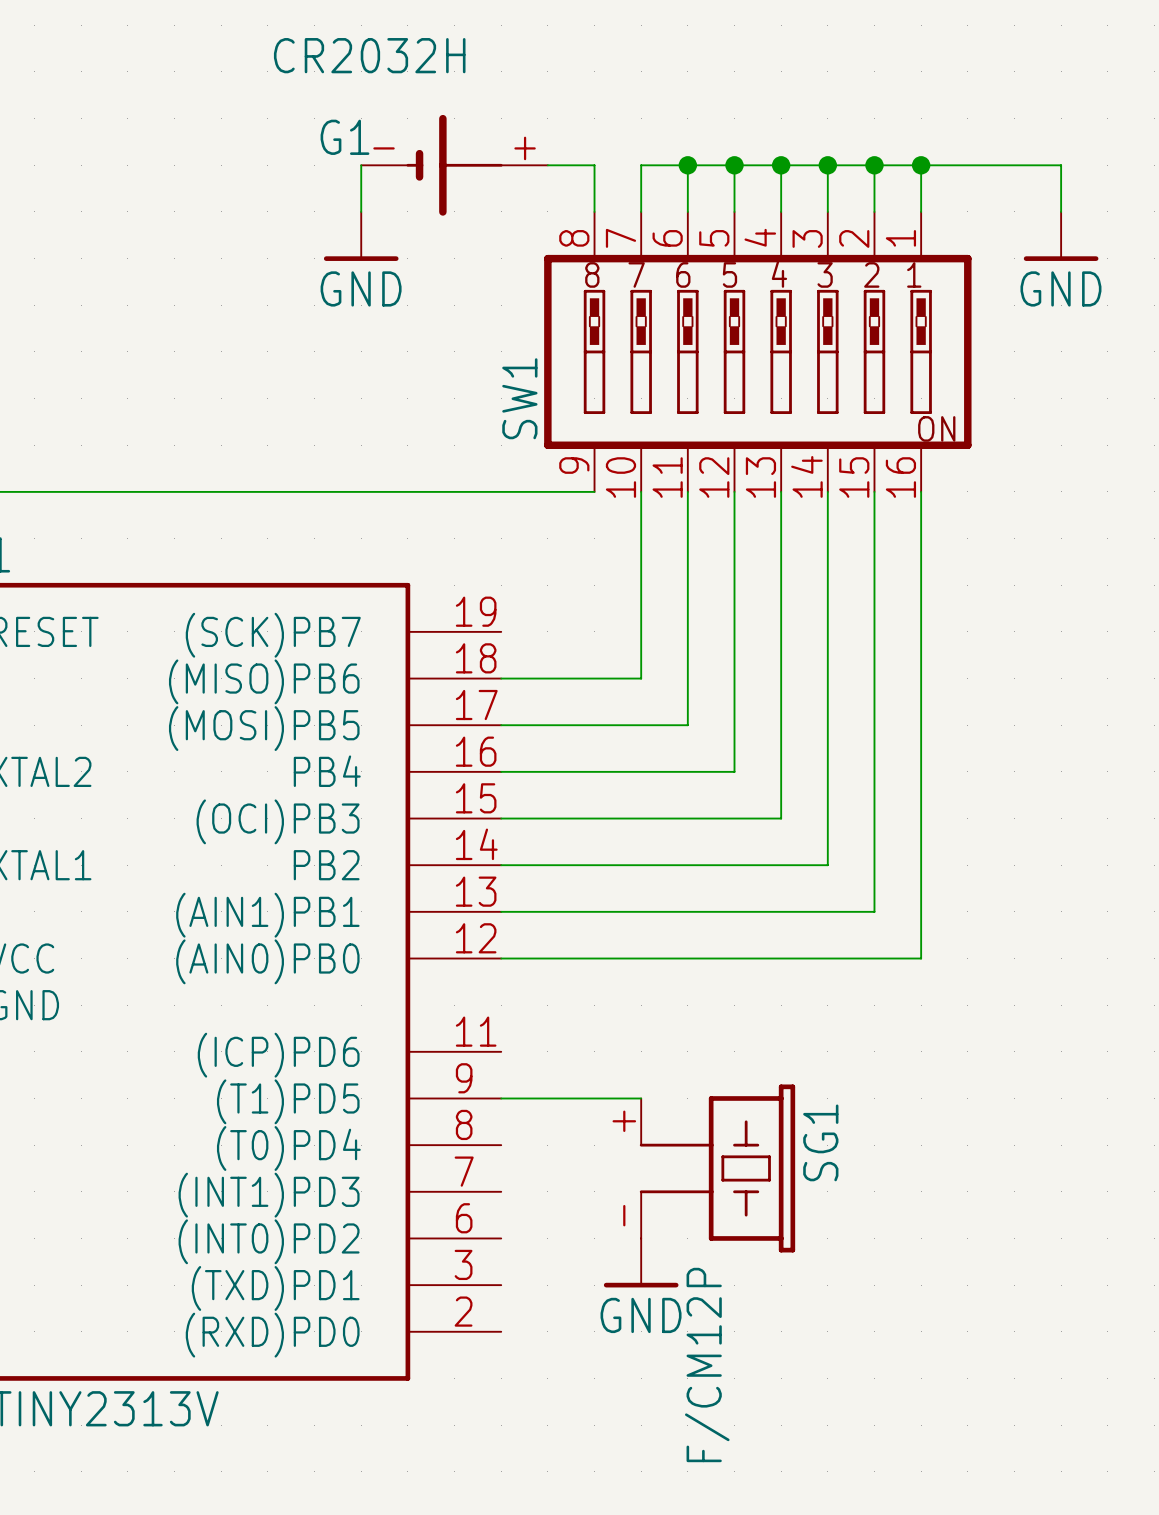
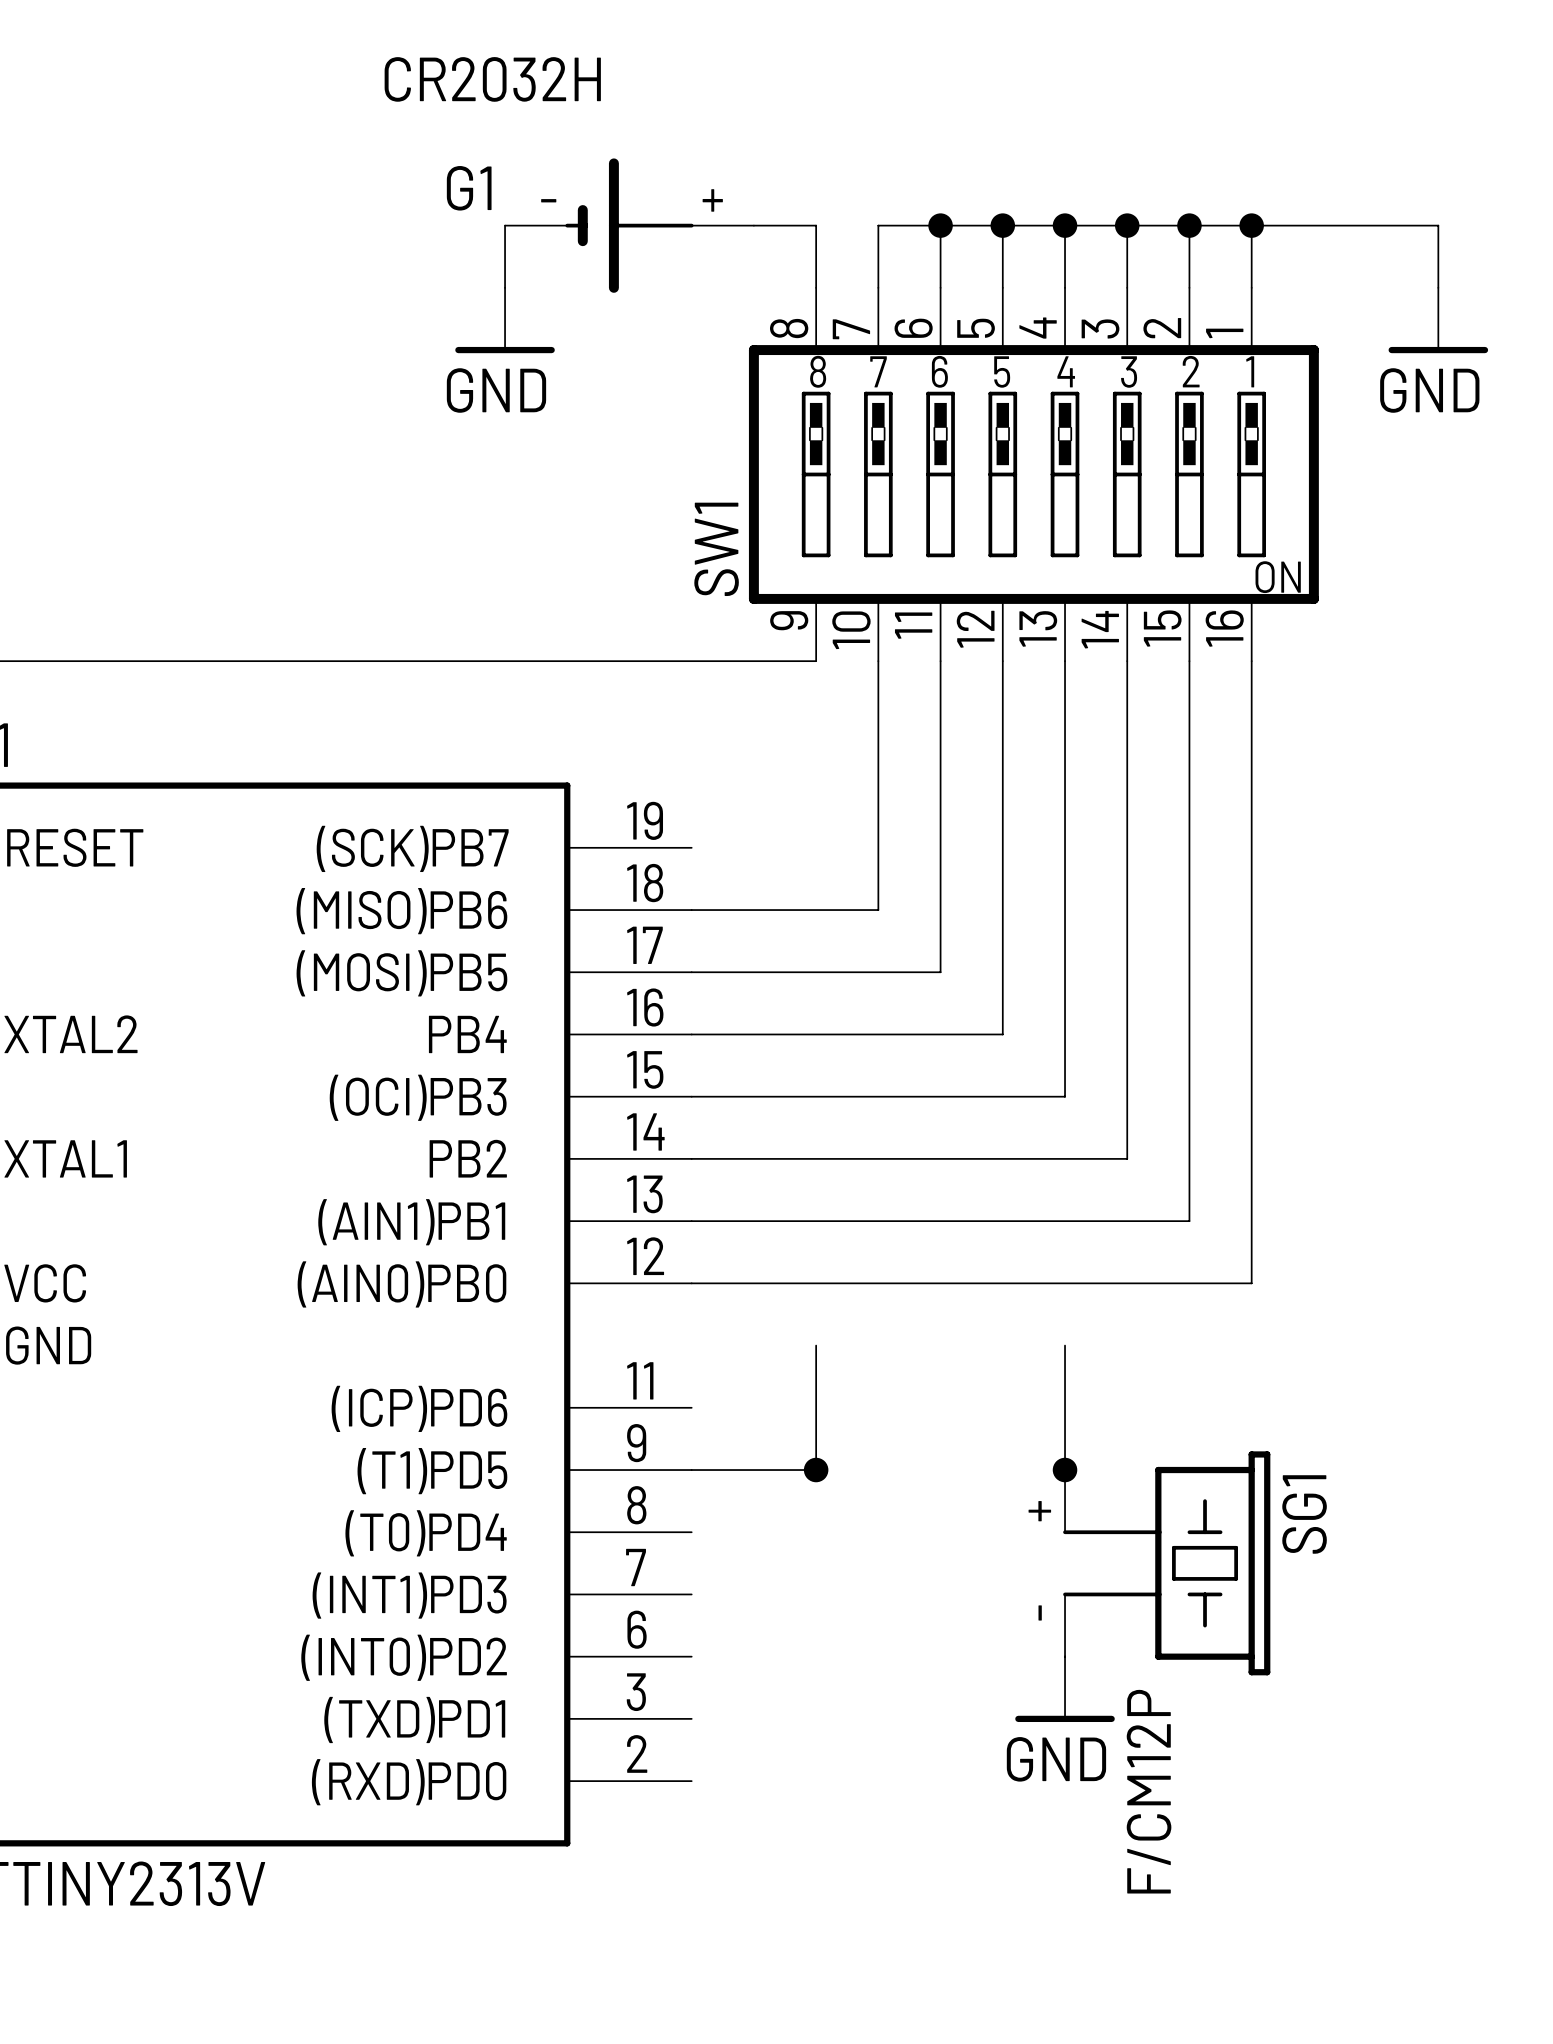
wire: none -> (1065, 1345) (1065, 1470)
wire: (594, 1098) (641, 1098) -> (816, 1470) (816, 1345)
junction: none -> (816, 1470)
junction: none -> (1065, 1470)
SG1 position: (717, 1168) -> (1166, 1563)
power symbol position: GND (641, 1262) -> GND (1065, 1689)

